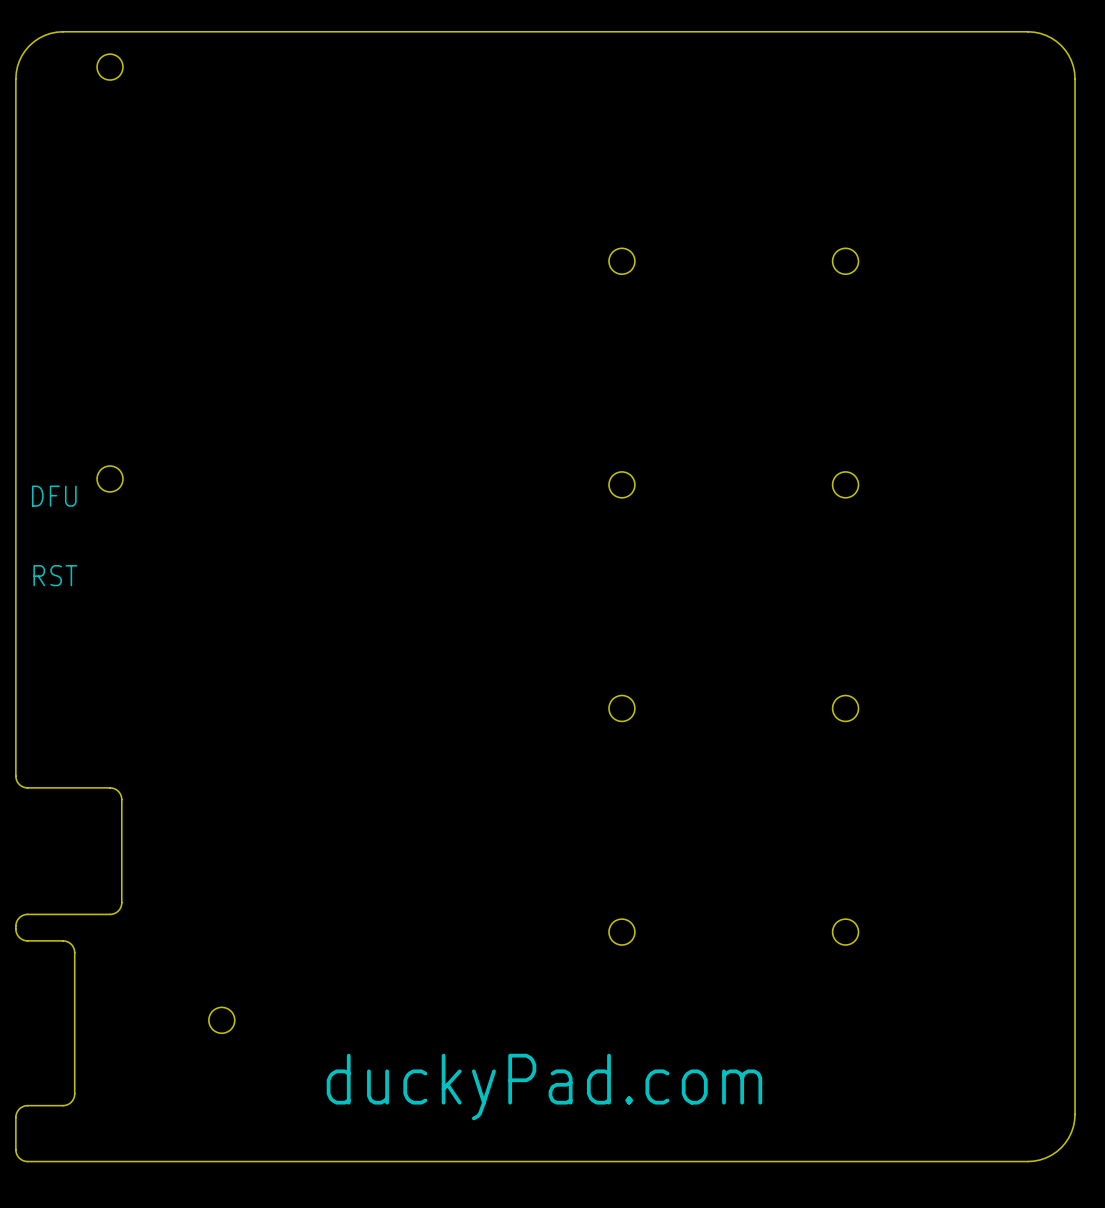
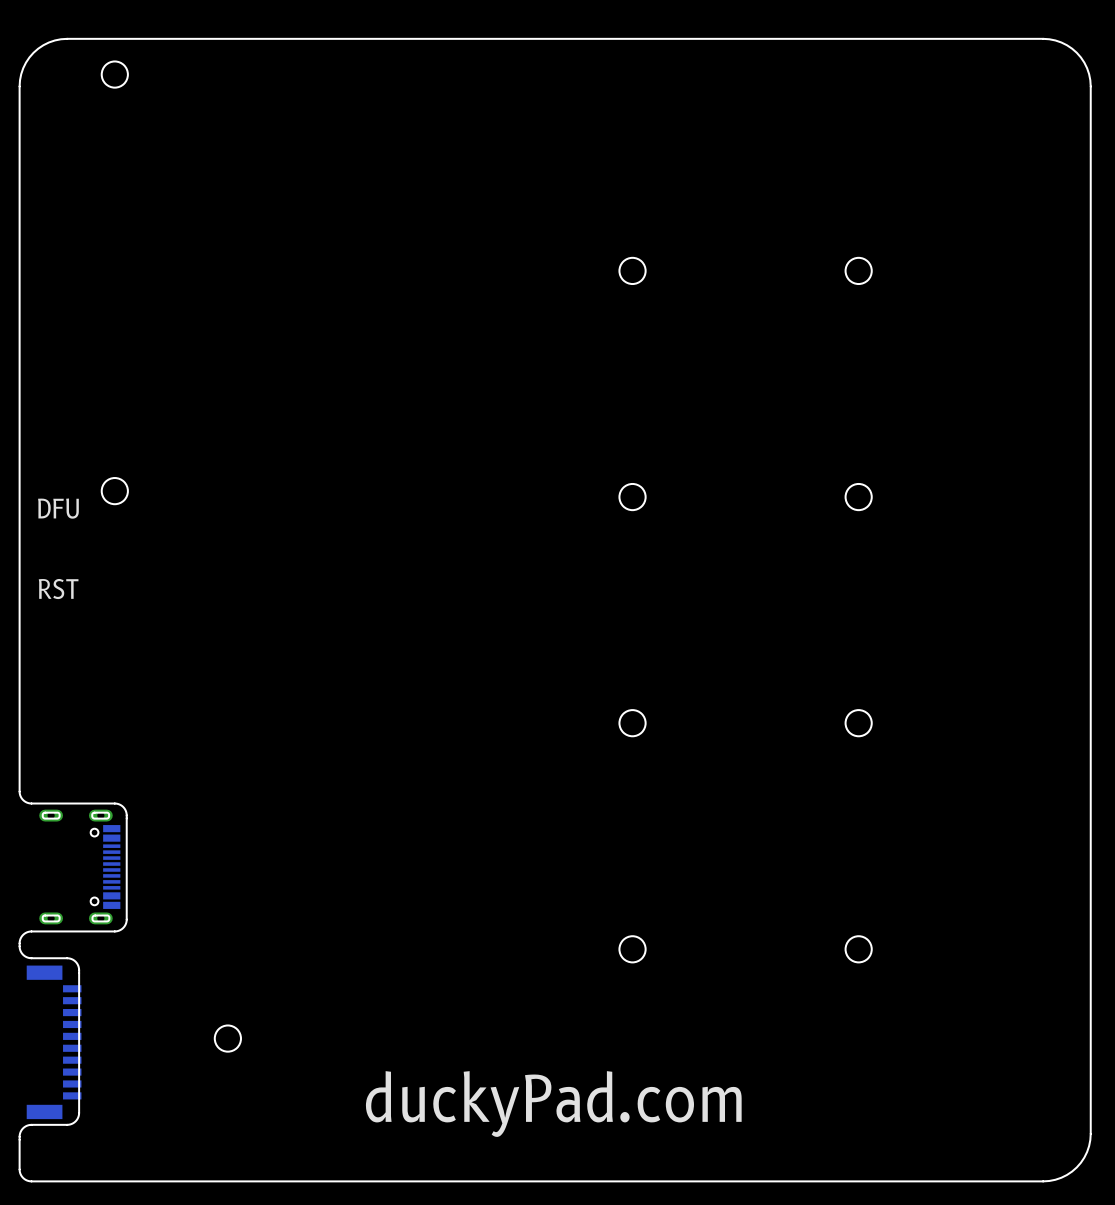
part: none -> (79, 867)
part: none -> (54, 1042)

